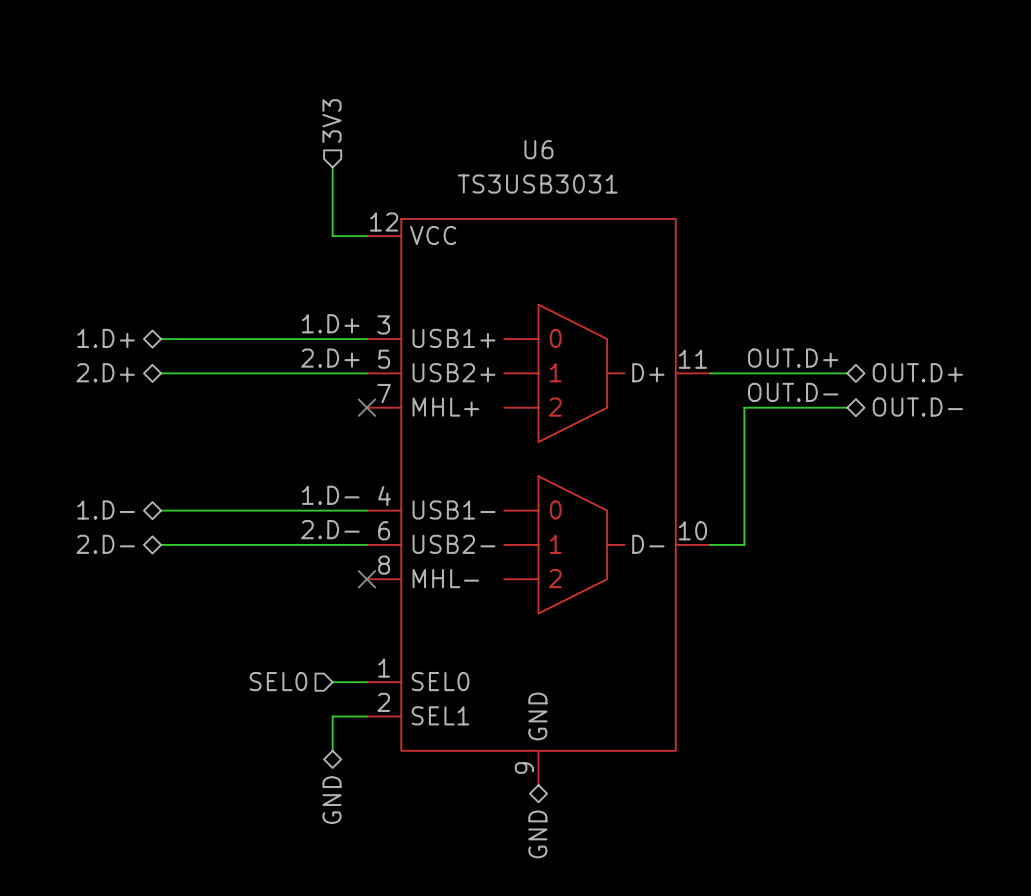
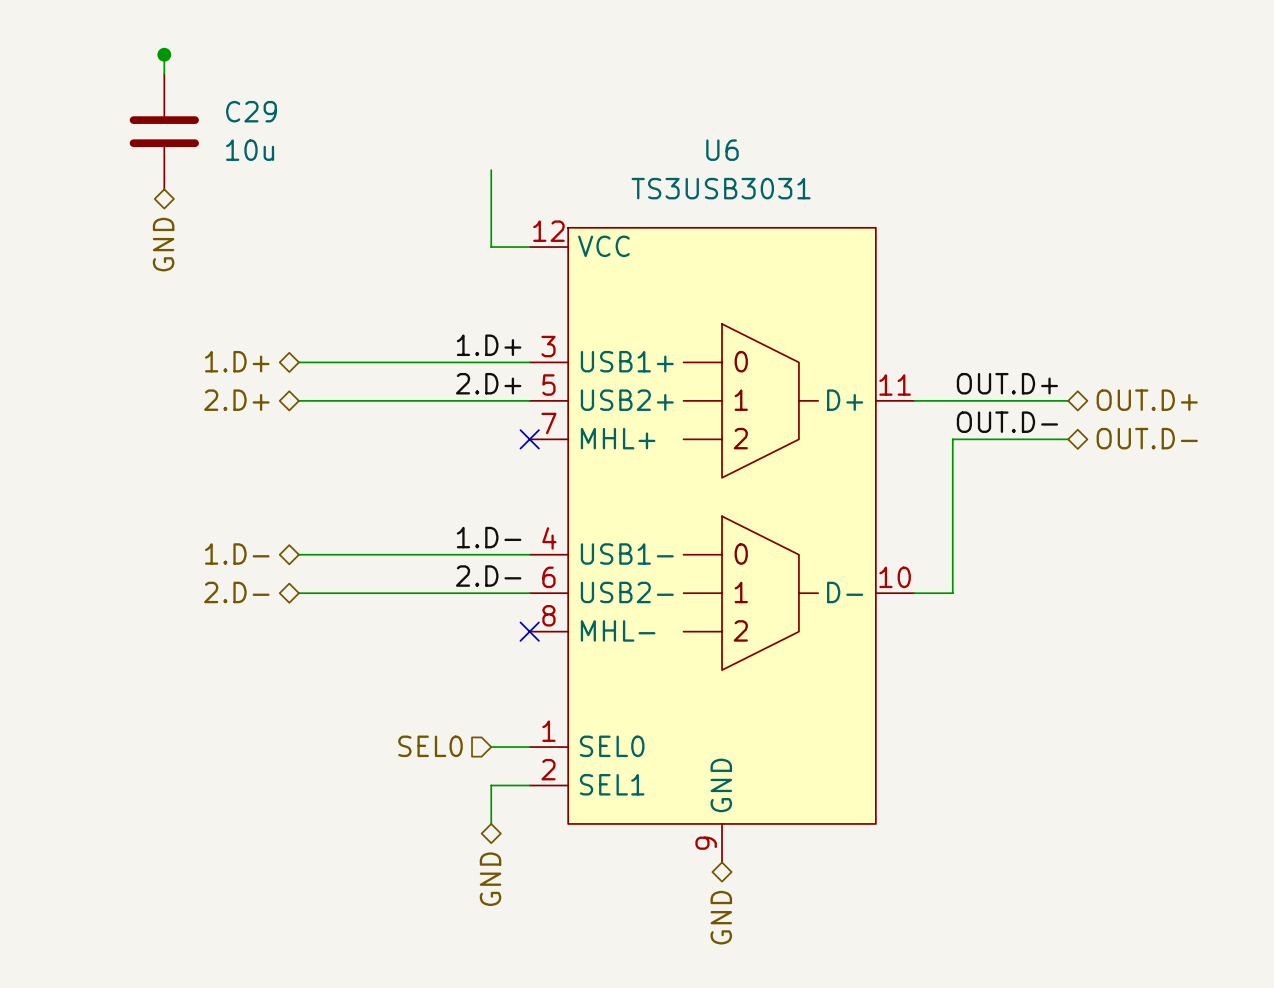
wire: none -> (164, 54) (164, 73)
junction: none -> (164, 54)
hierarchical label: 3V3 (332, 121) -> none
C29: none -> 10u (164, 131)
hierarchical label: none -> GND (163, 244)

